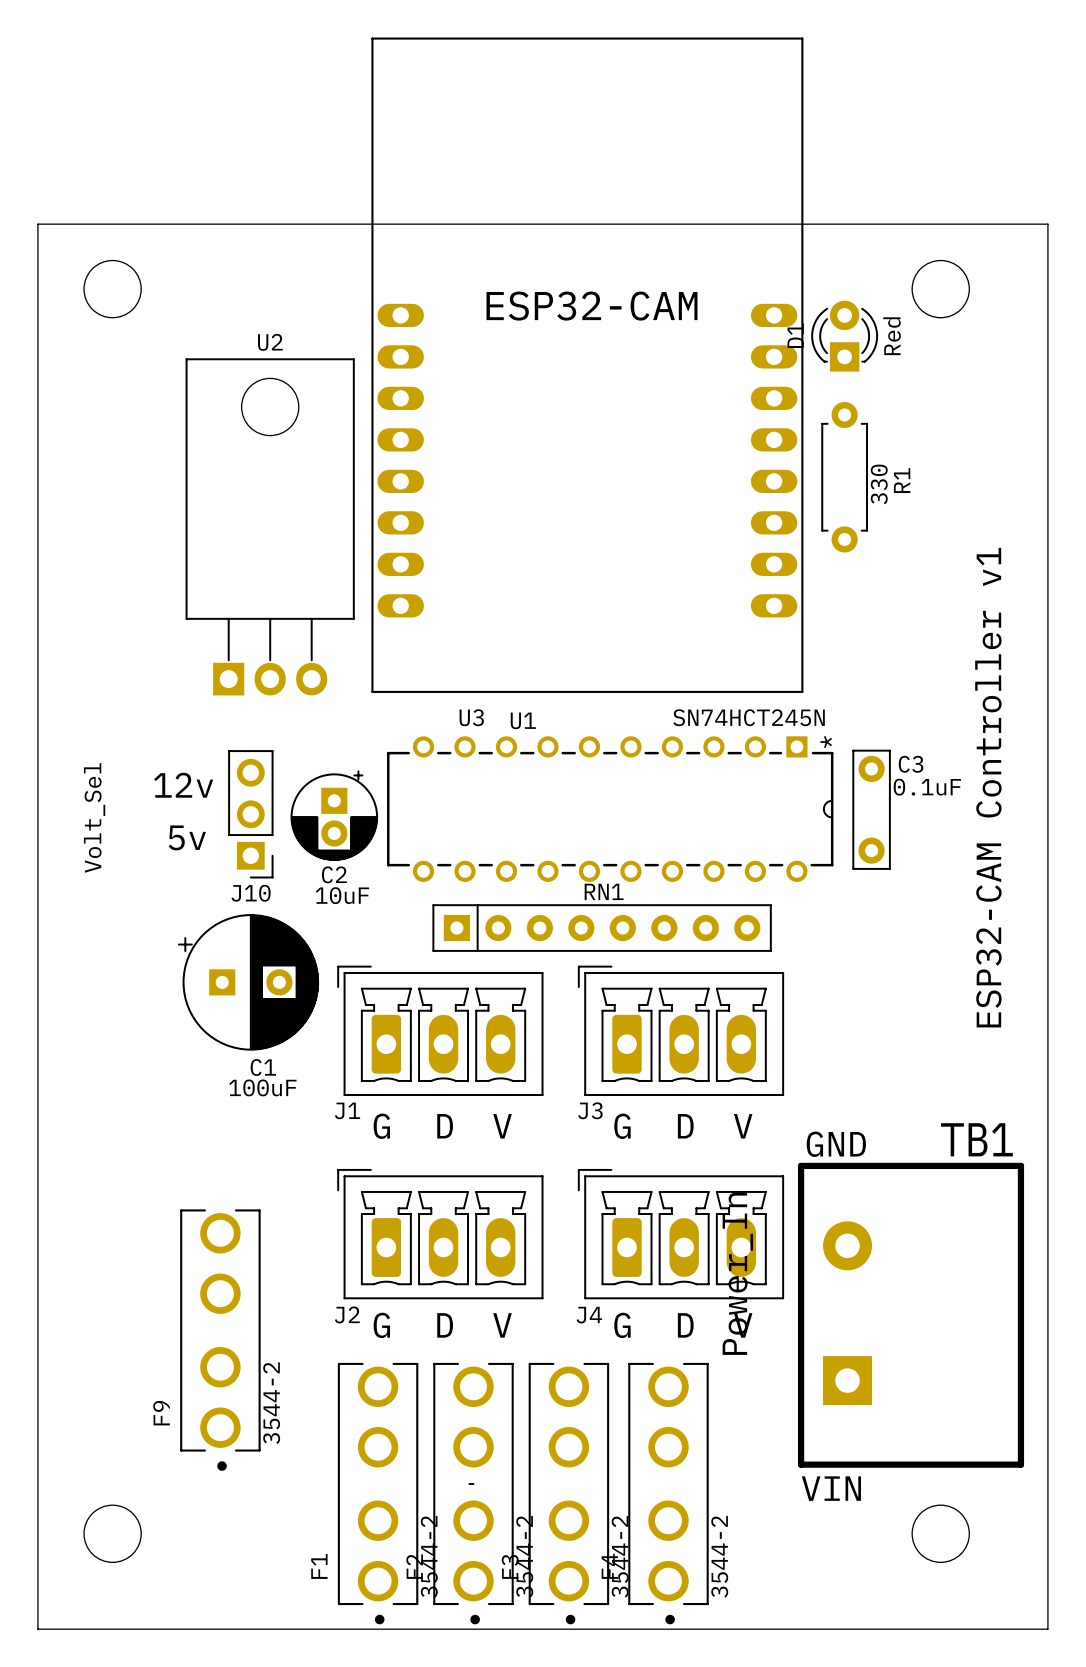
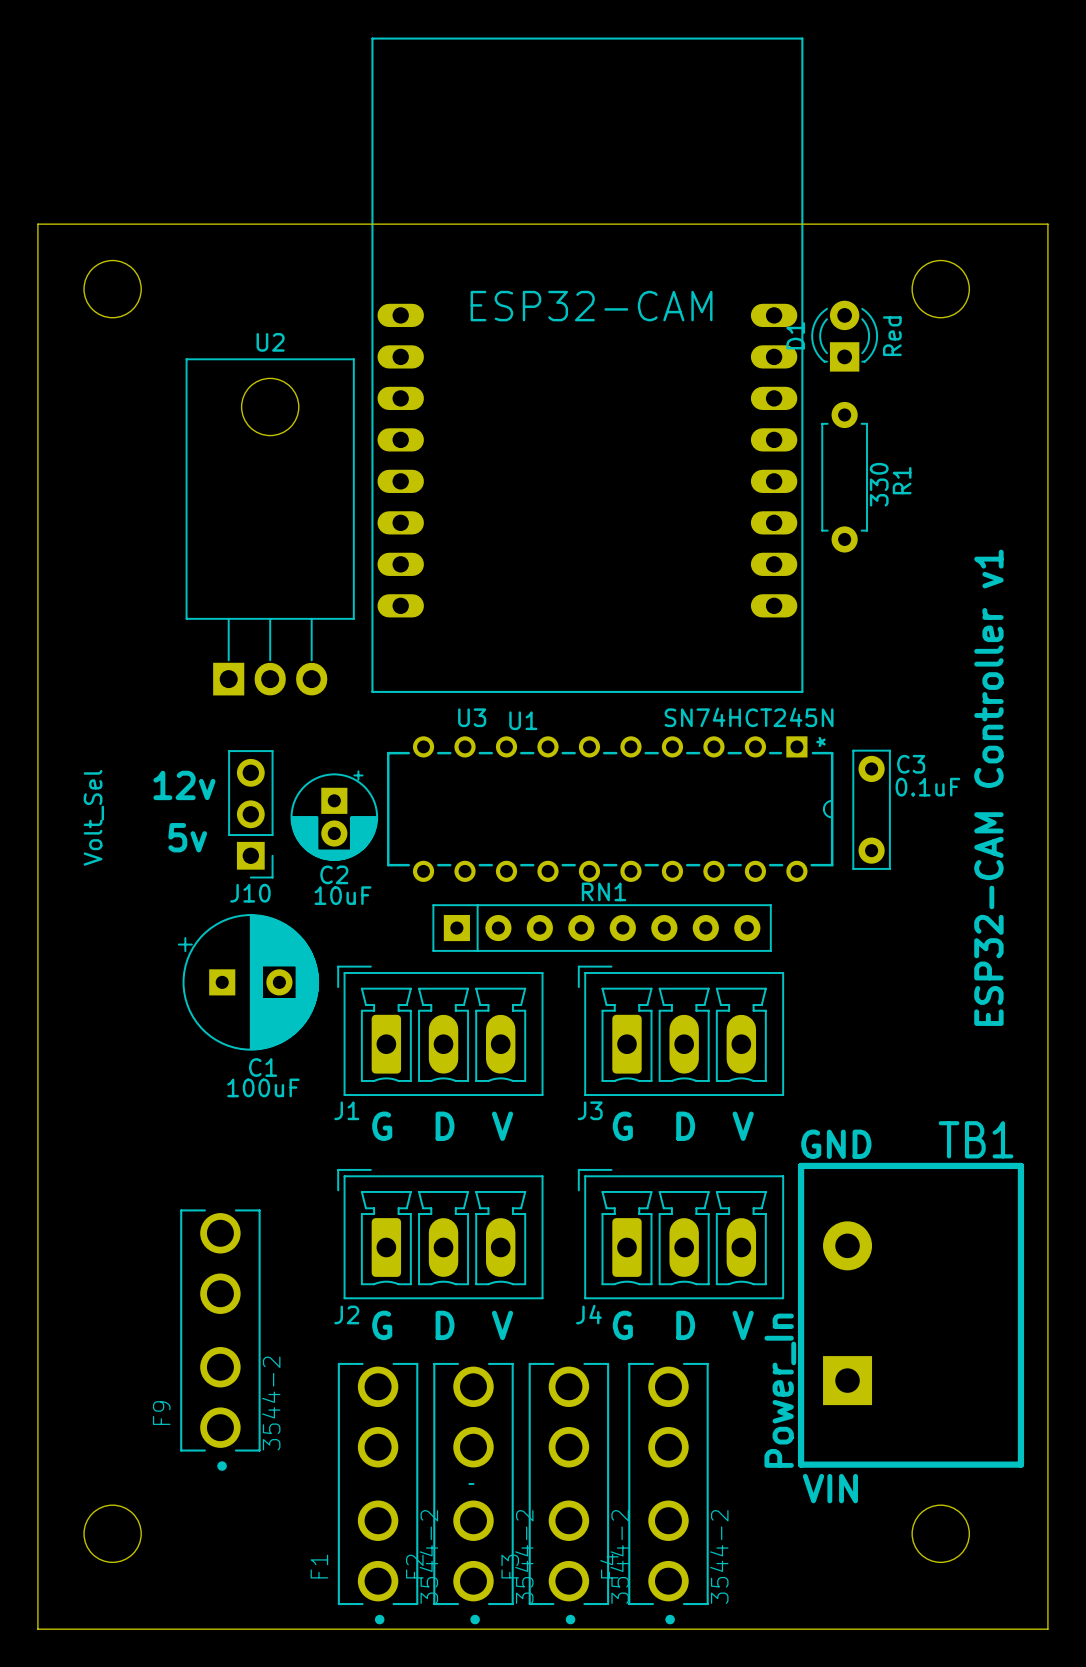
TB1 value position: Power_In (737, 1273) -> Power_In (780, 1390)

